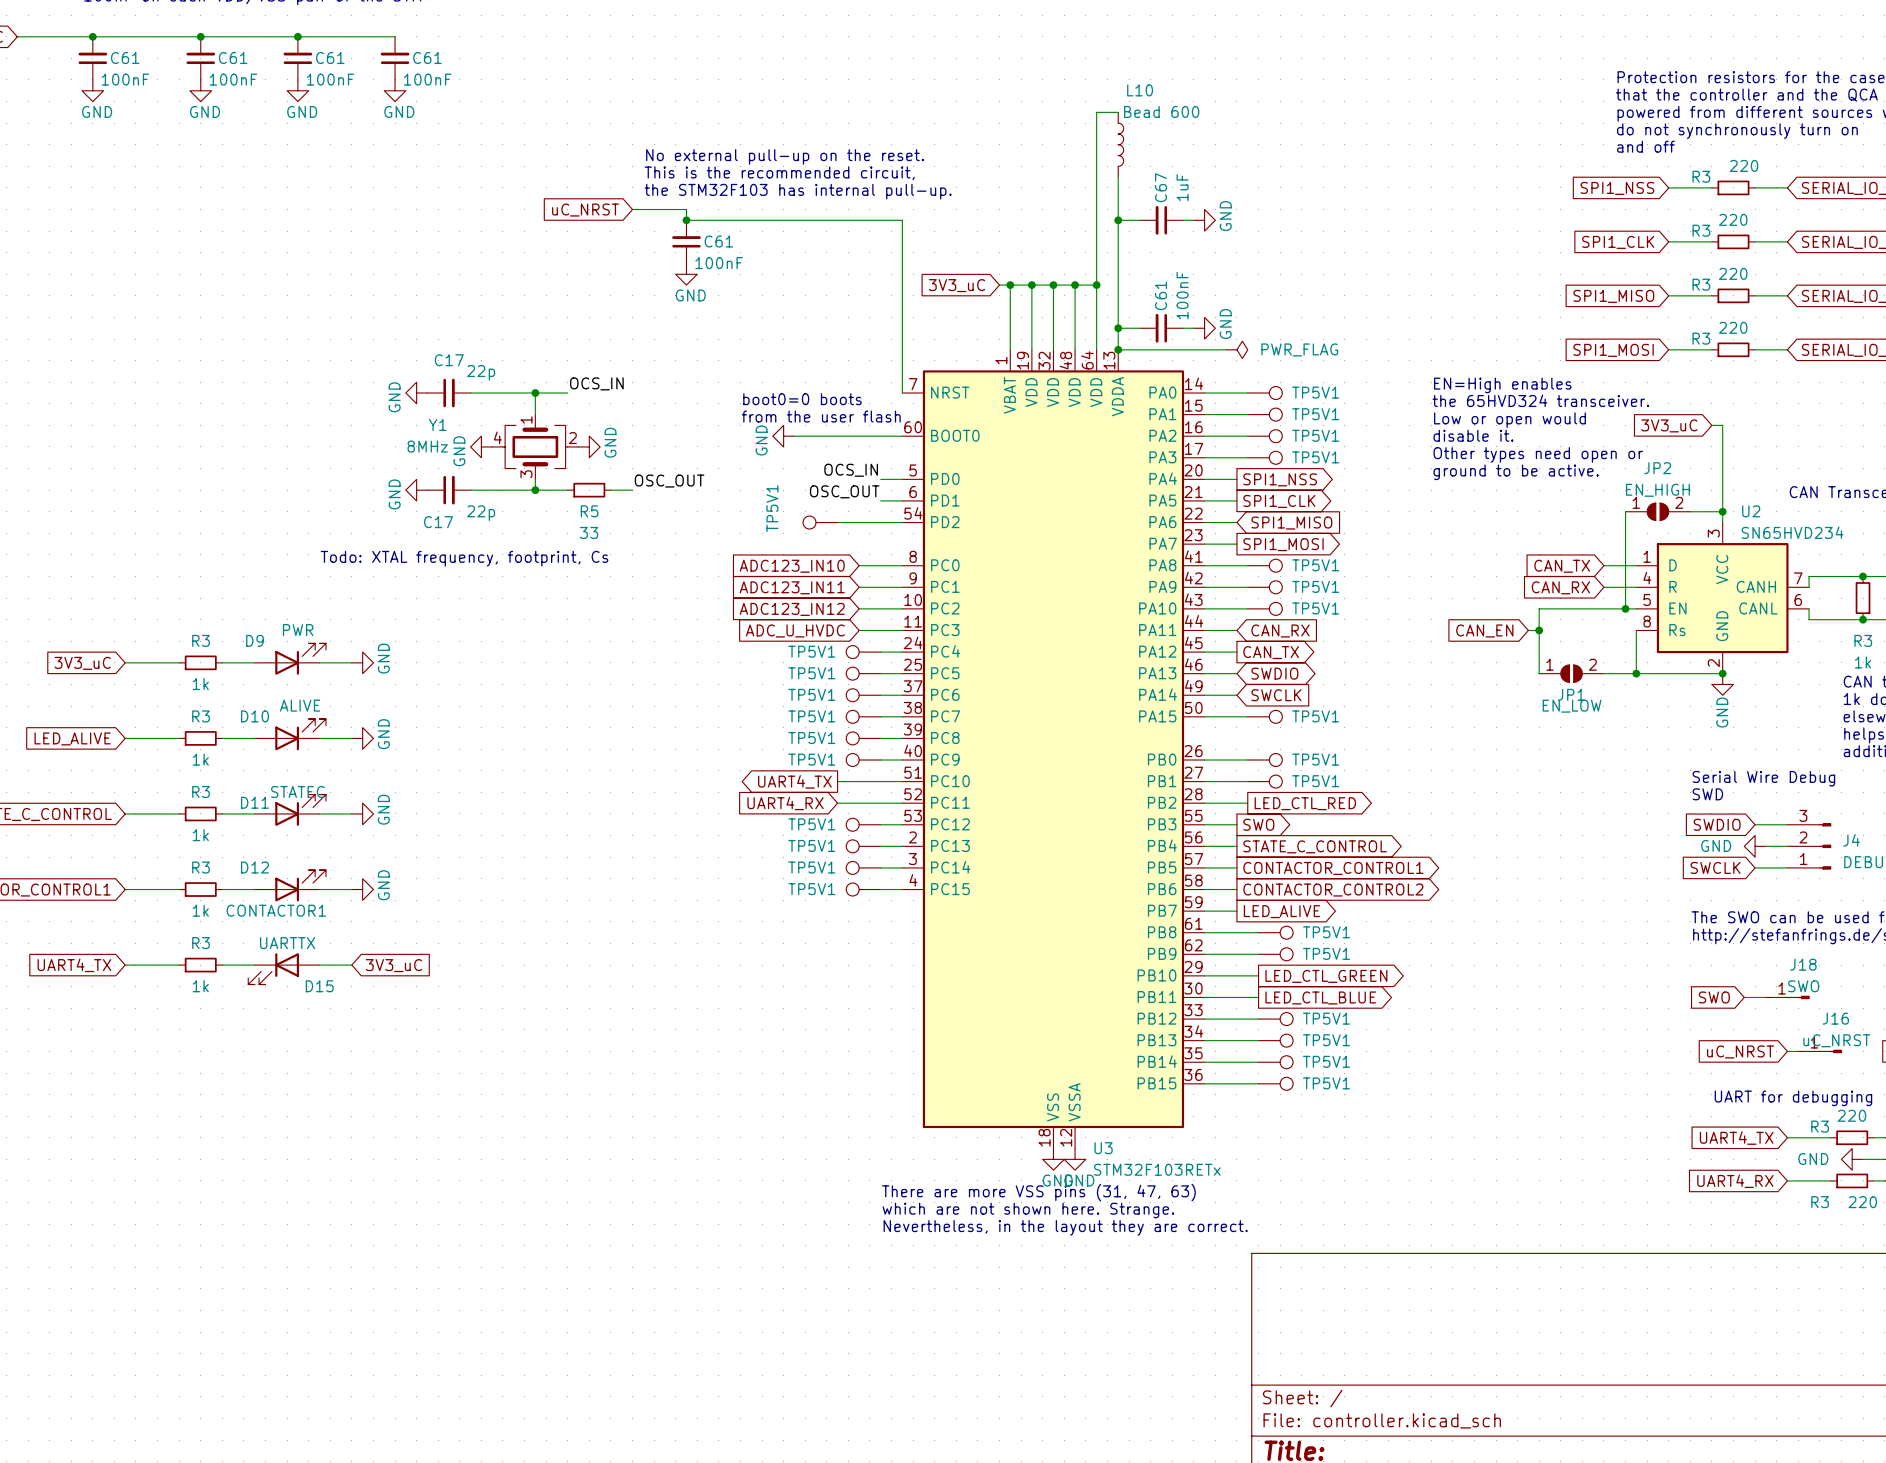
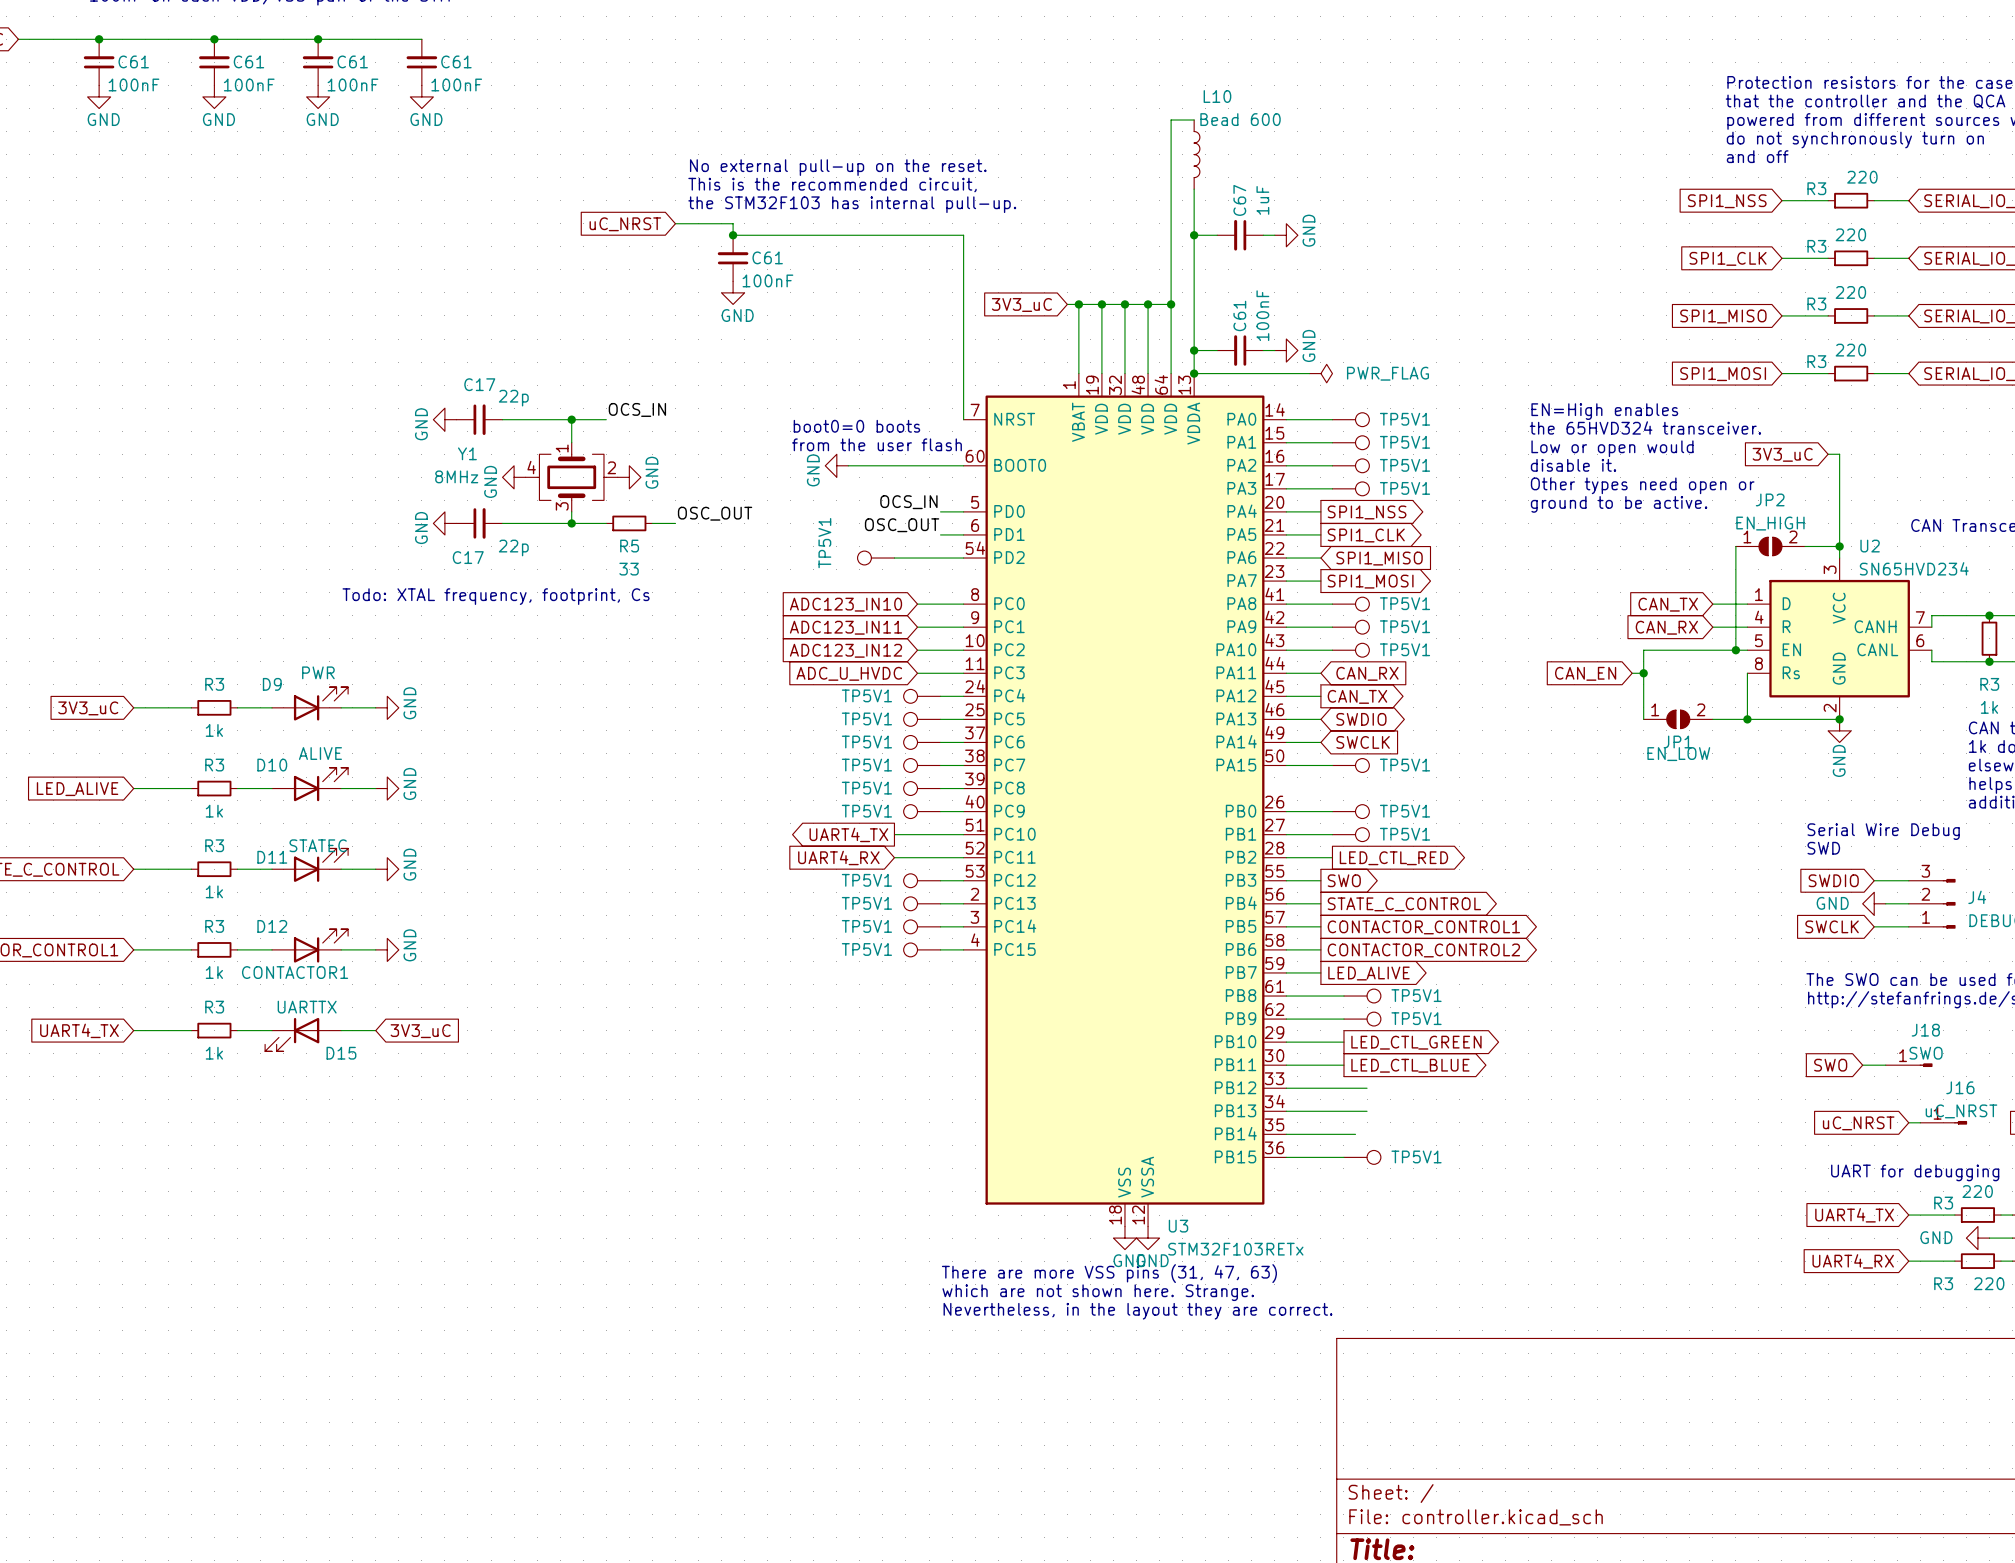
TP5V1: (1275, 1019) -> none
TP5V1: (1275, 1040) -> none
TP5V1: (1275, 1062) -> none

